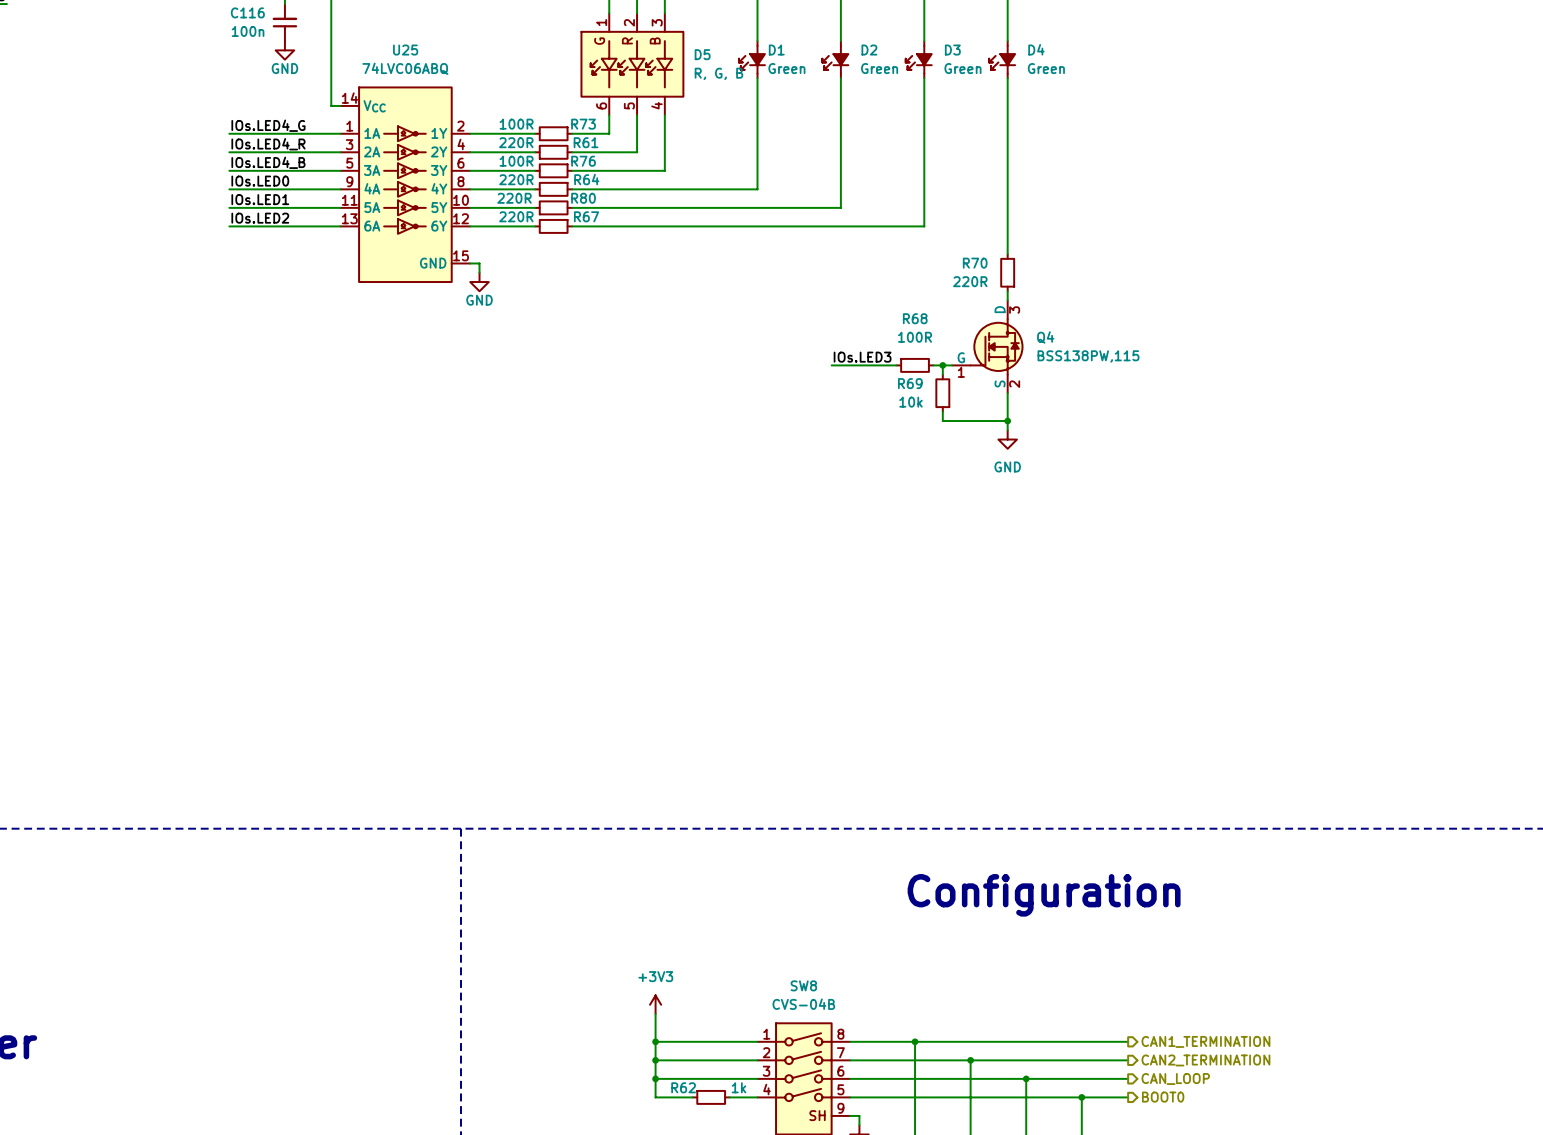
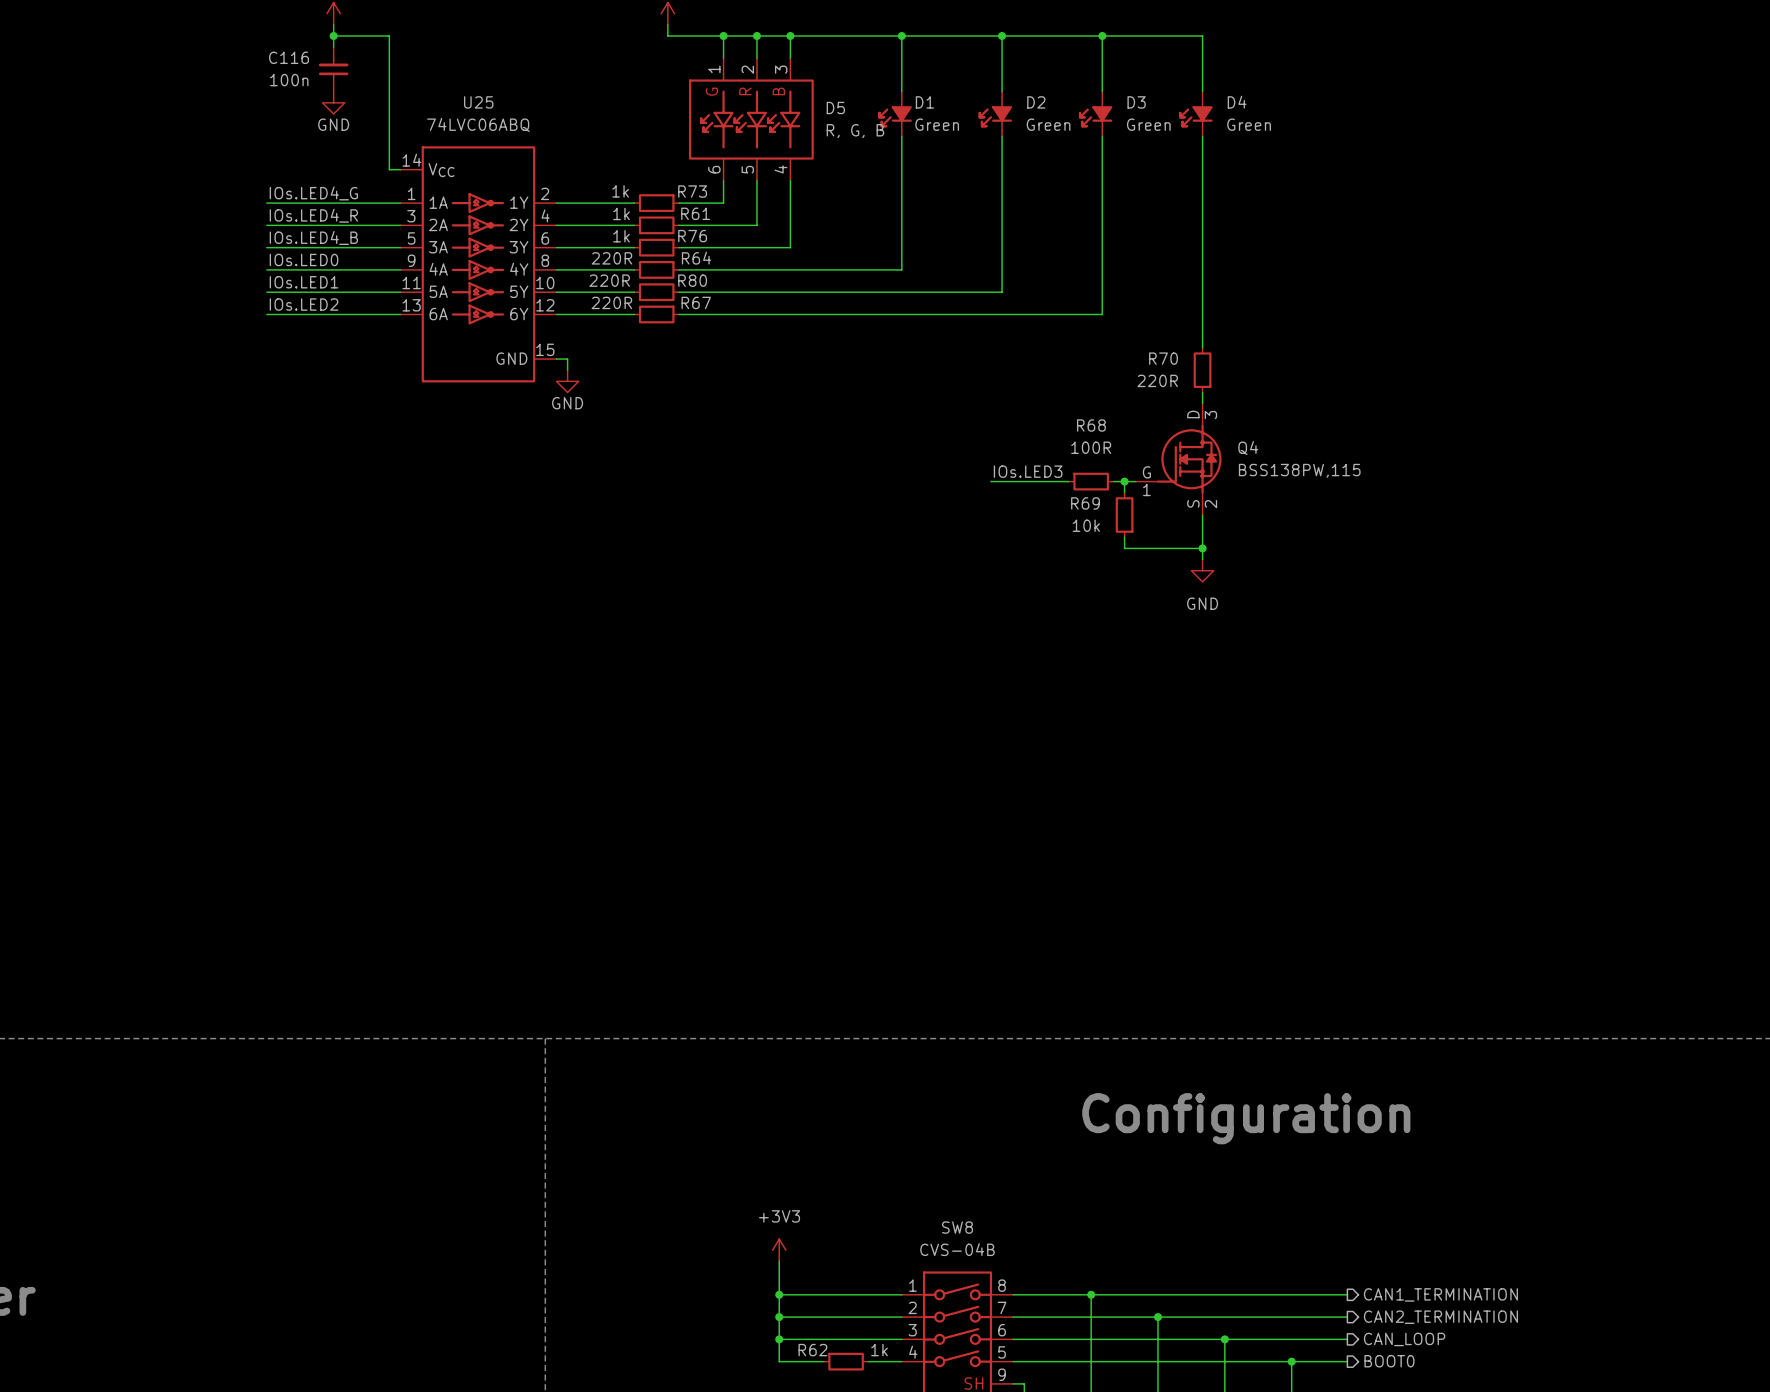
R73 text: 100R (516, 124) -> 1k (621, 213)
R61 text: 220R (516, 142) -> 1k (620, 191)
R76 text: 100R (516, 161) -> 1k (621, 236)

